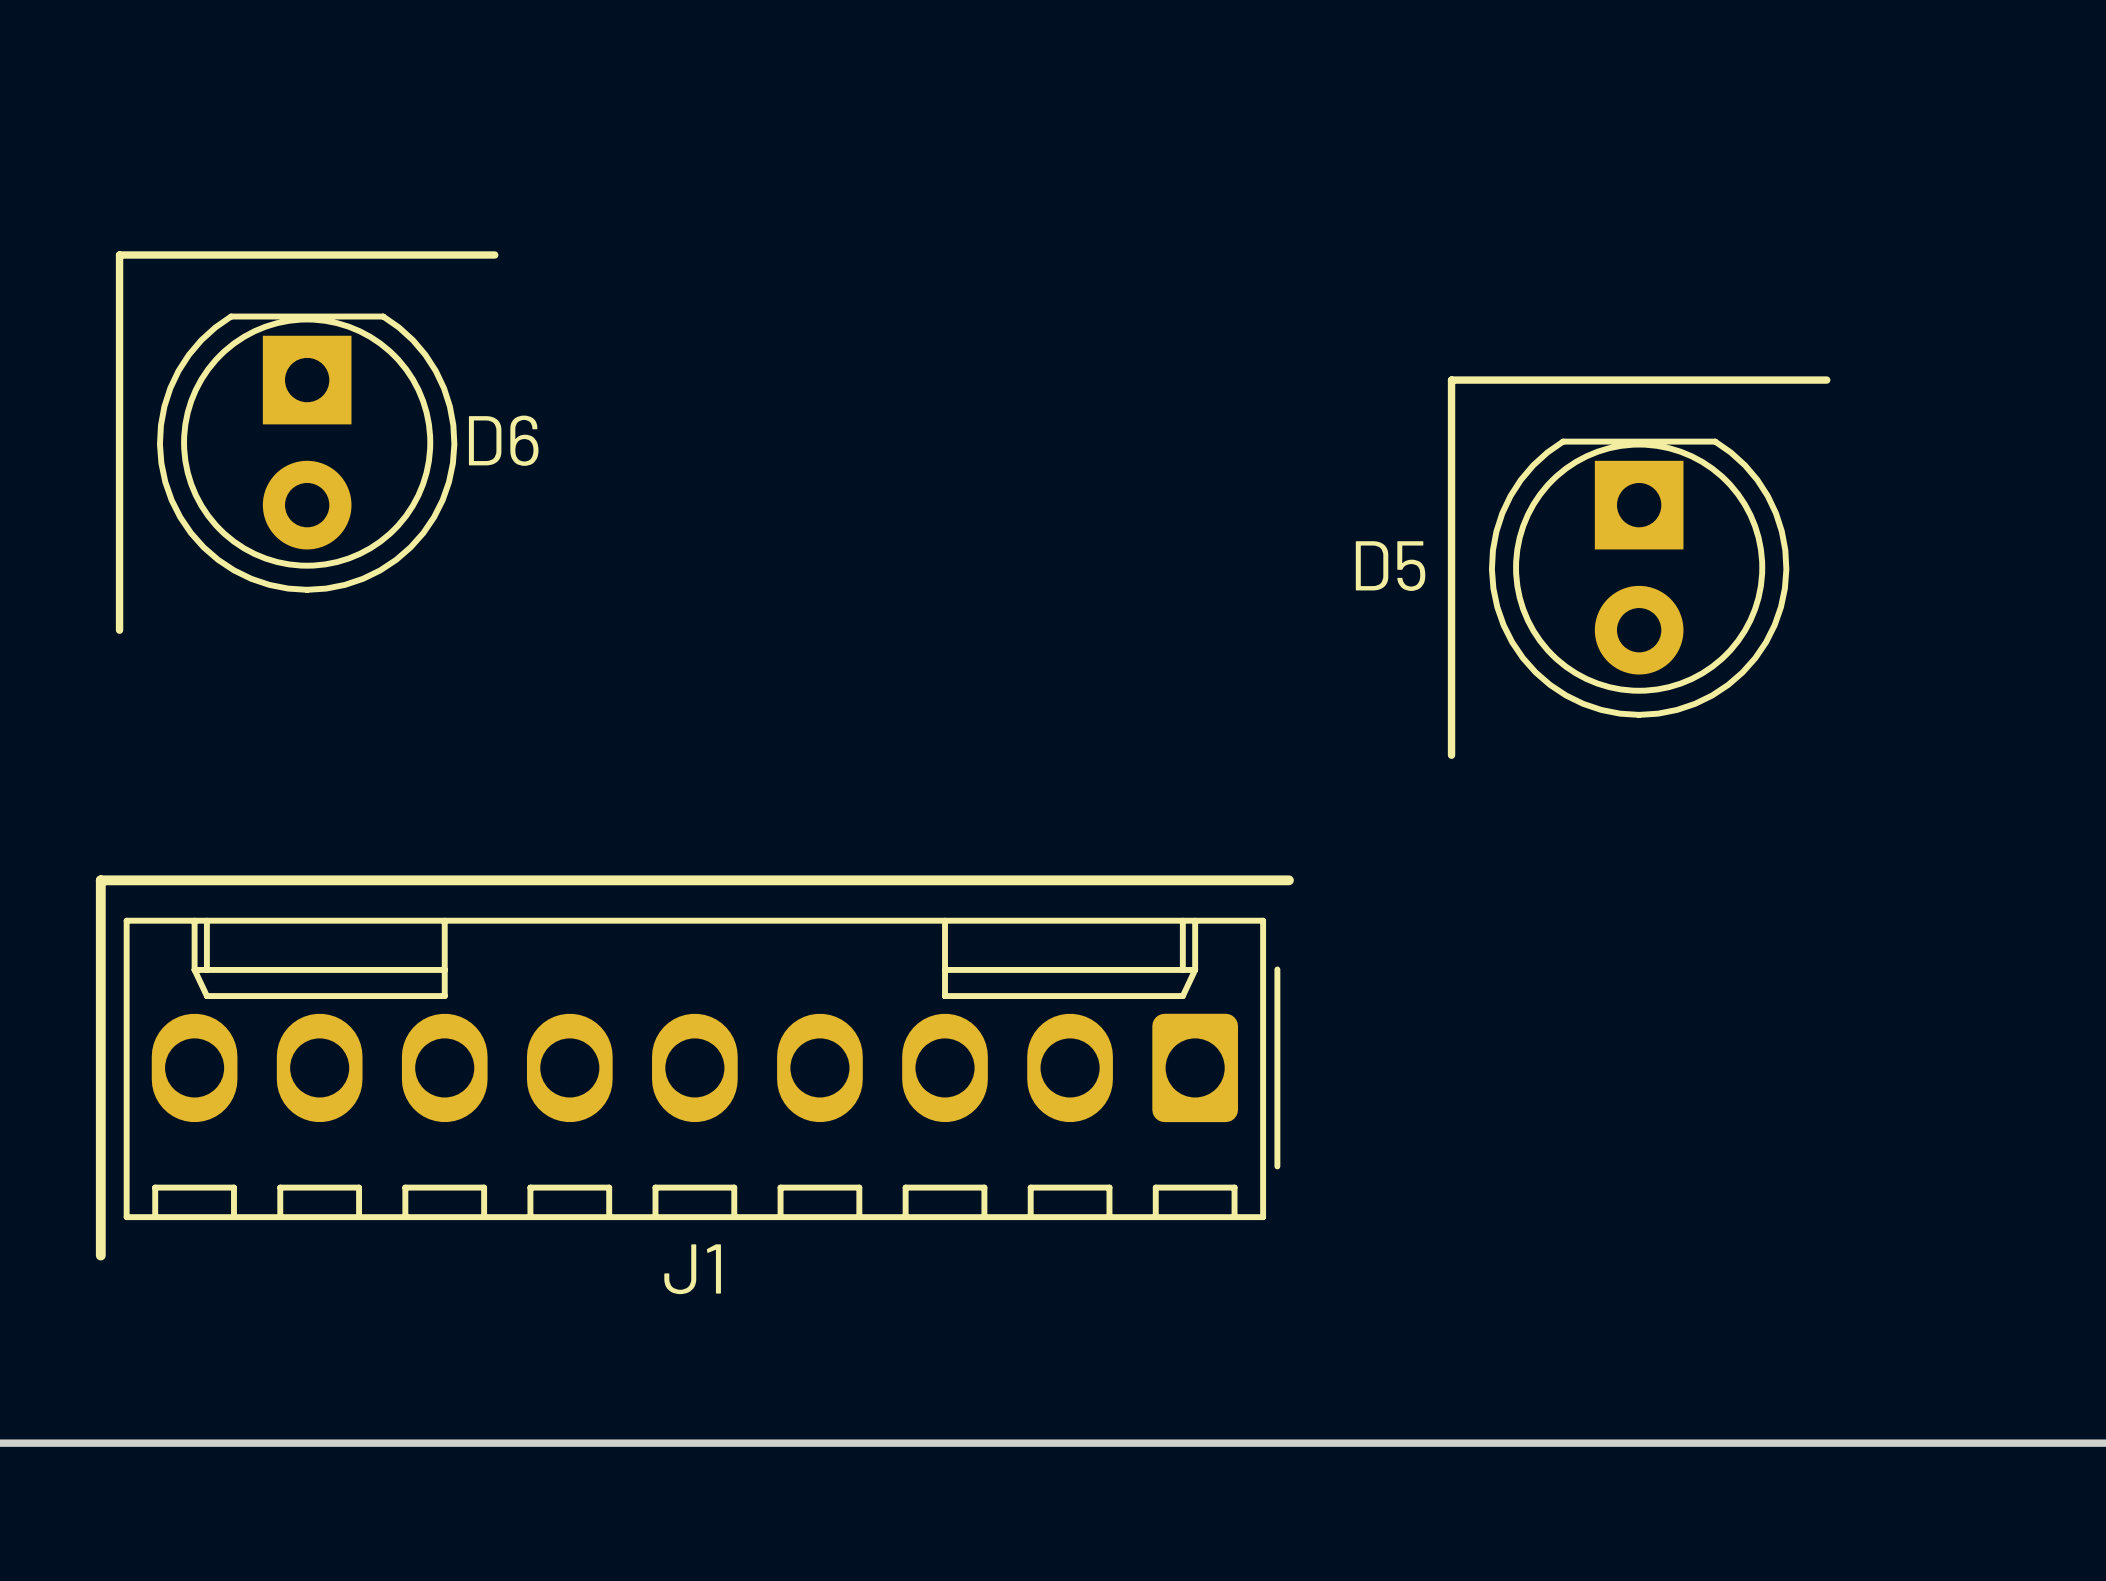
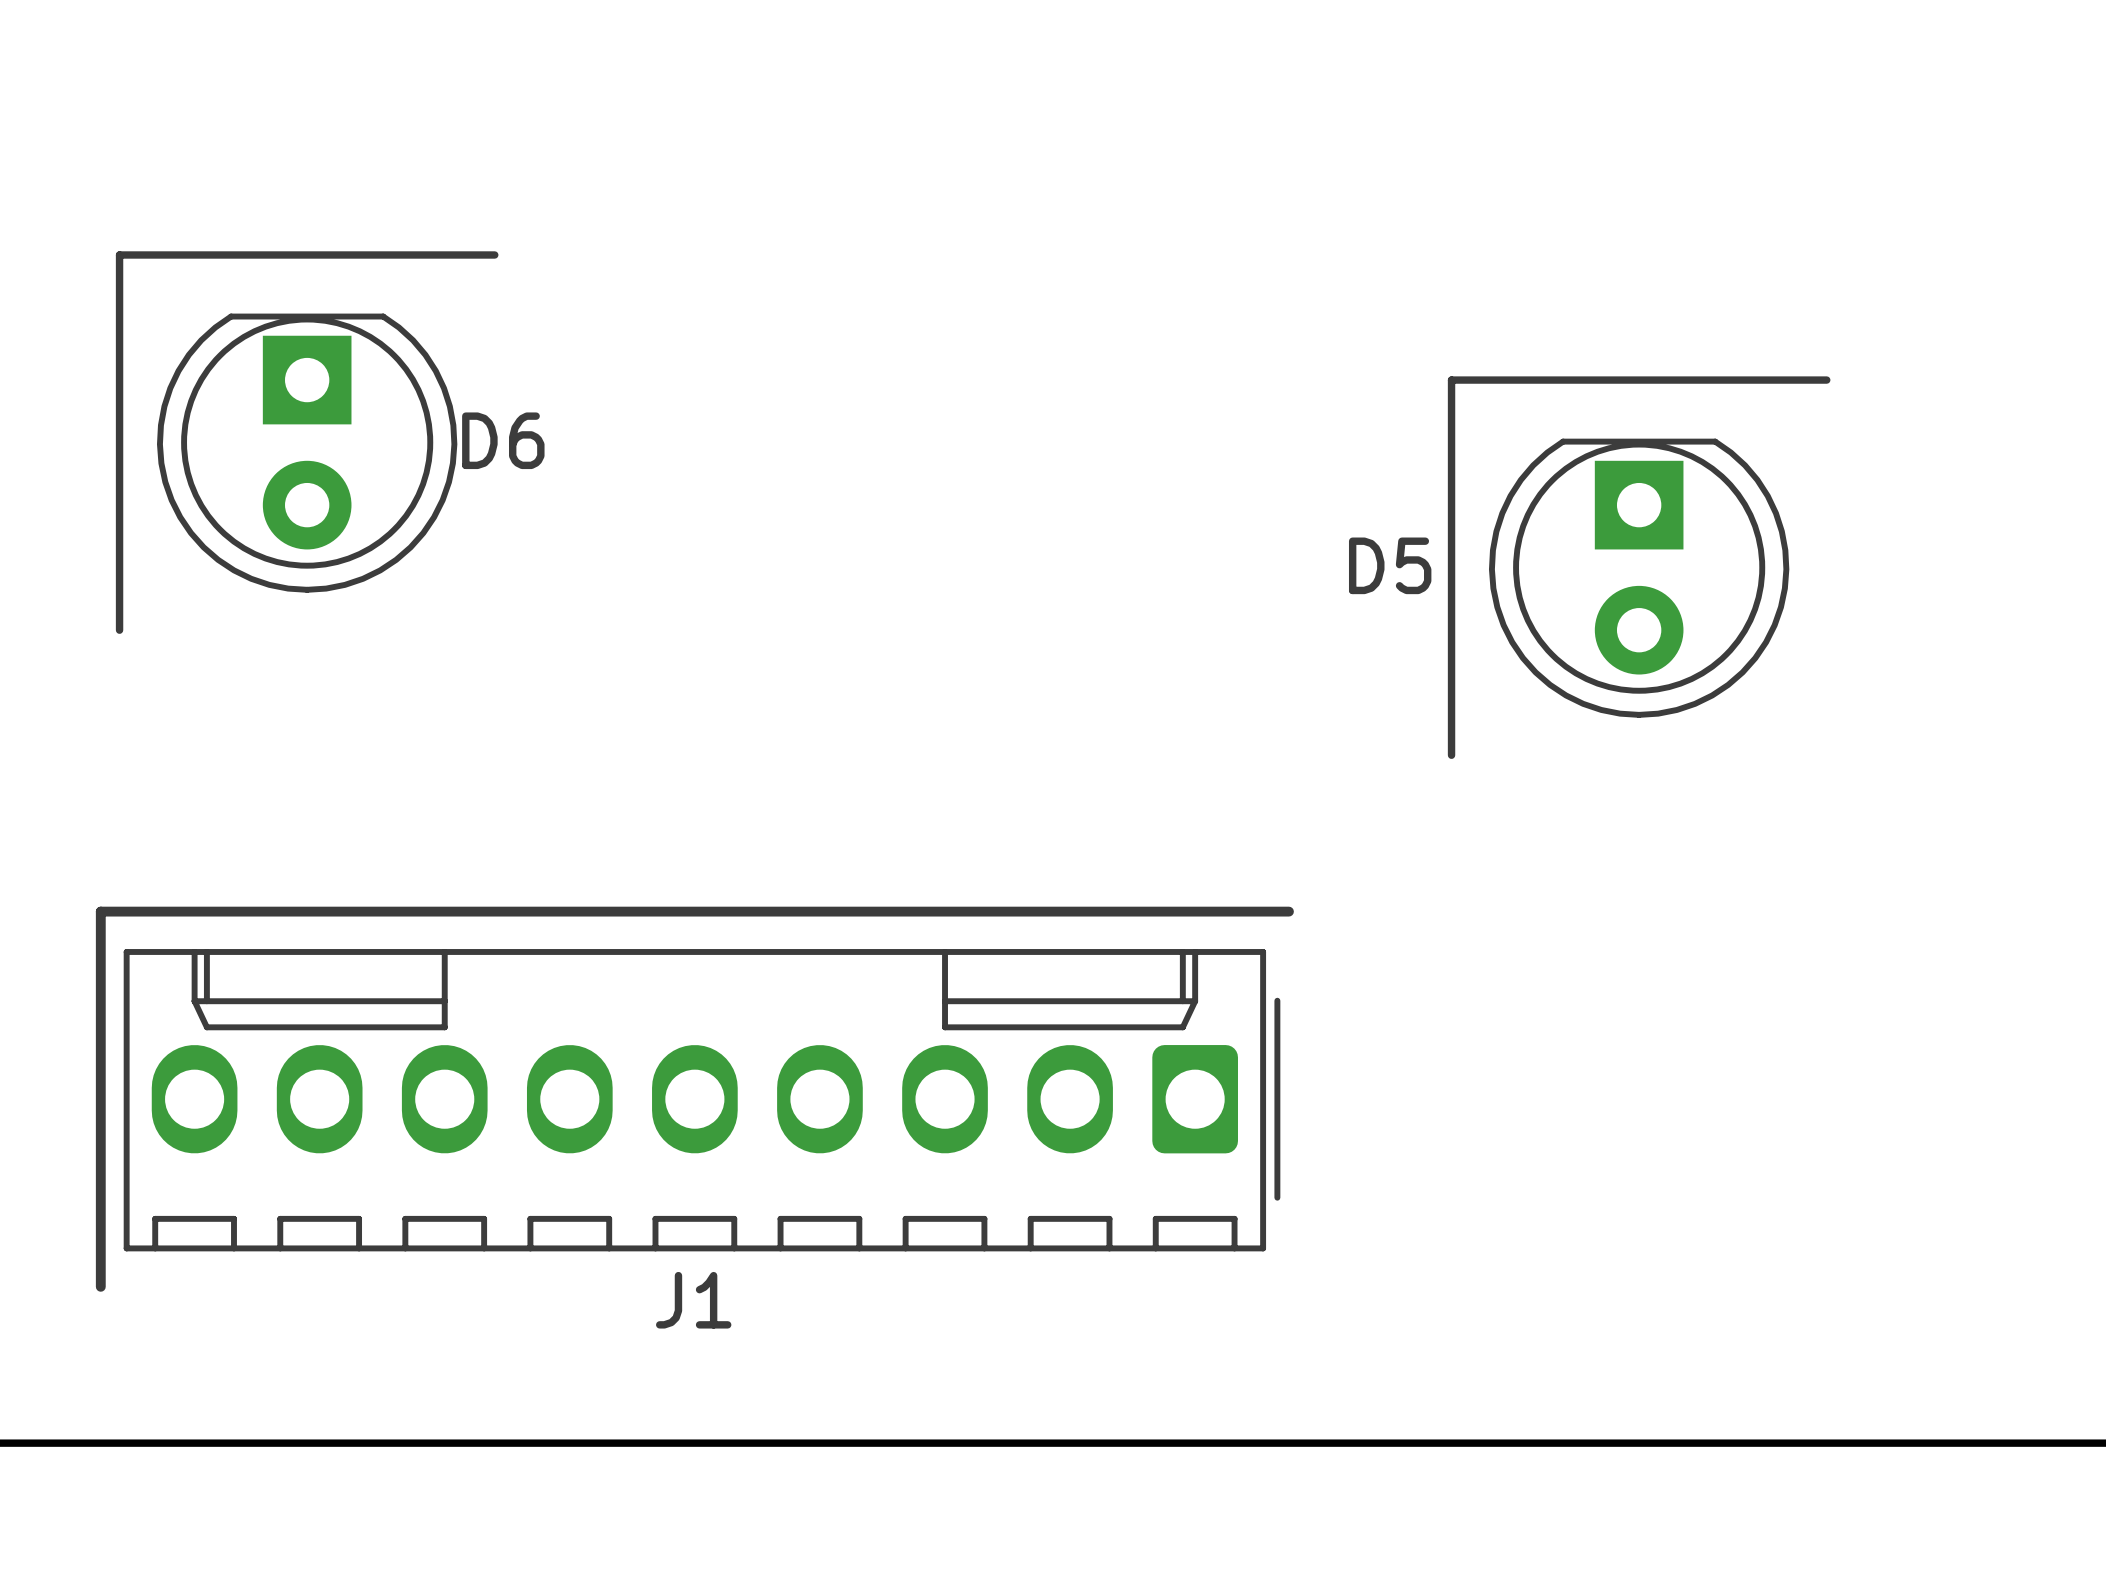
line: (1288, 880) (100, 880) (100, 911) -> (1288, 911) (100, 911)
J1 position: (702, 1068) -> (702, 1100)
line: none -> (100, 1255) (100, 1286)

